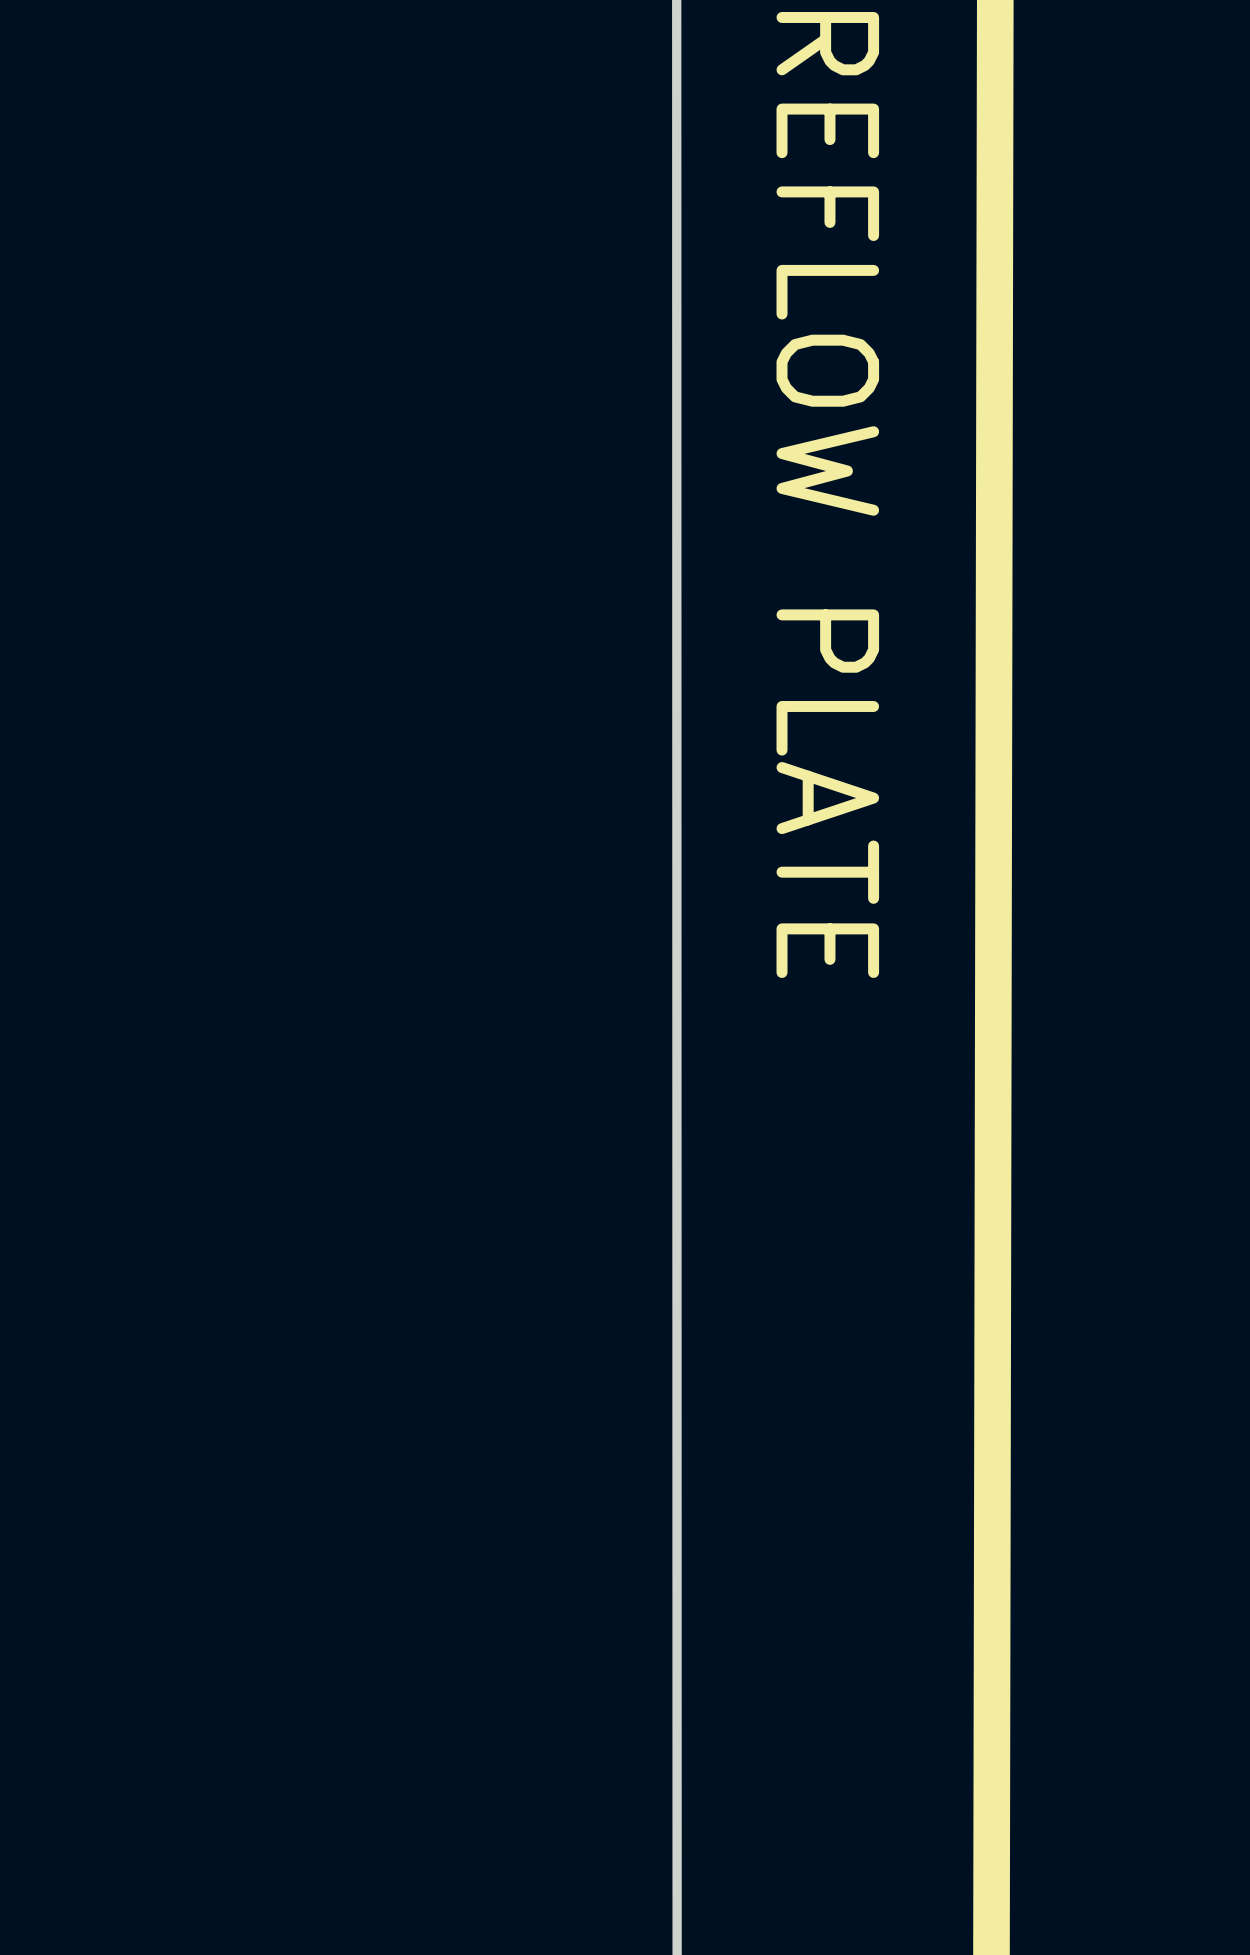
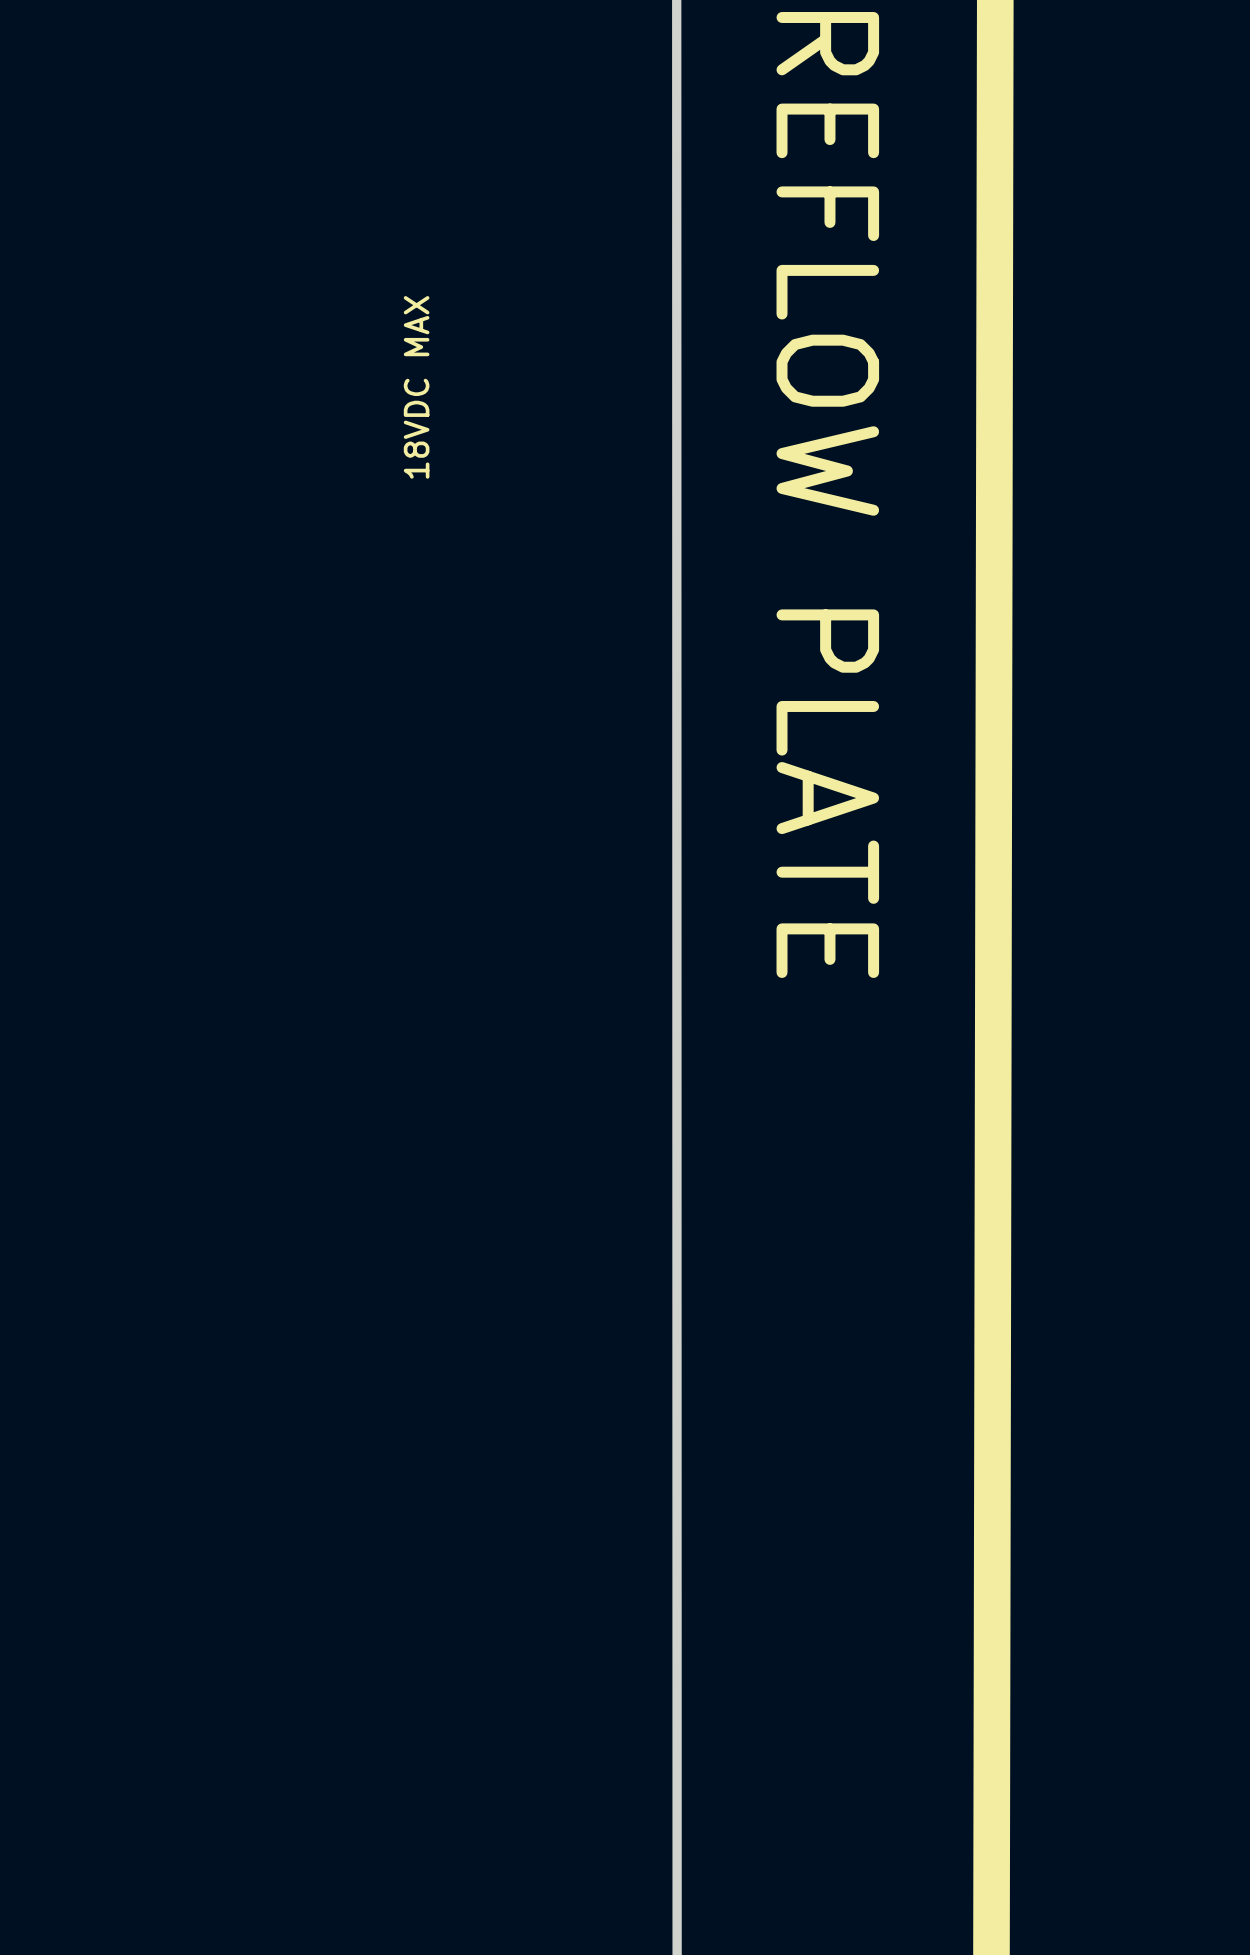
text: none -> 18VDC MAX (416, 387)

